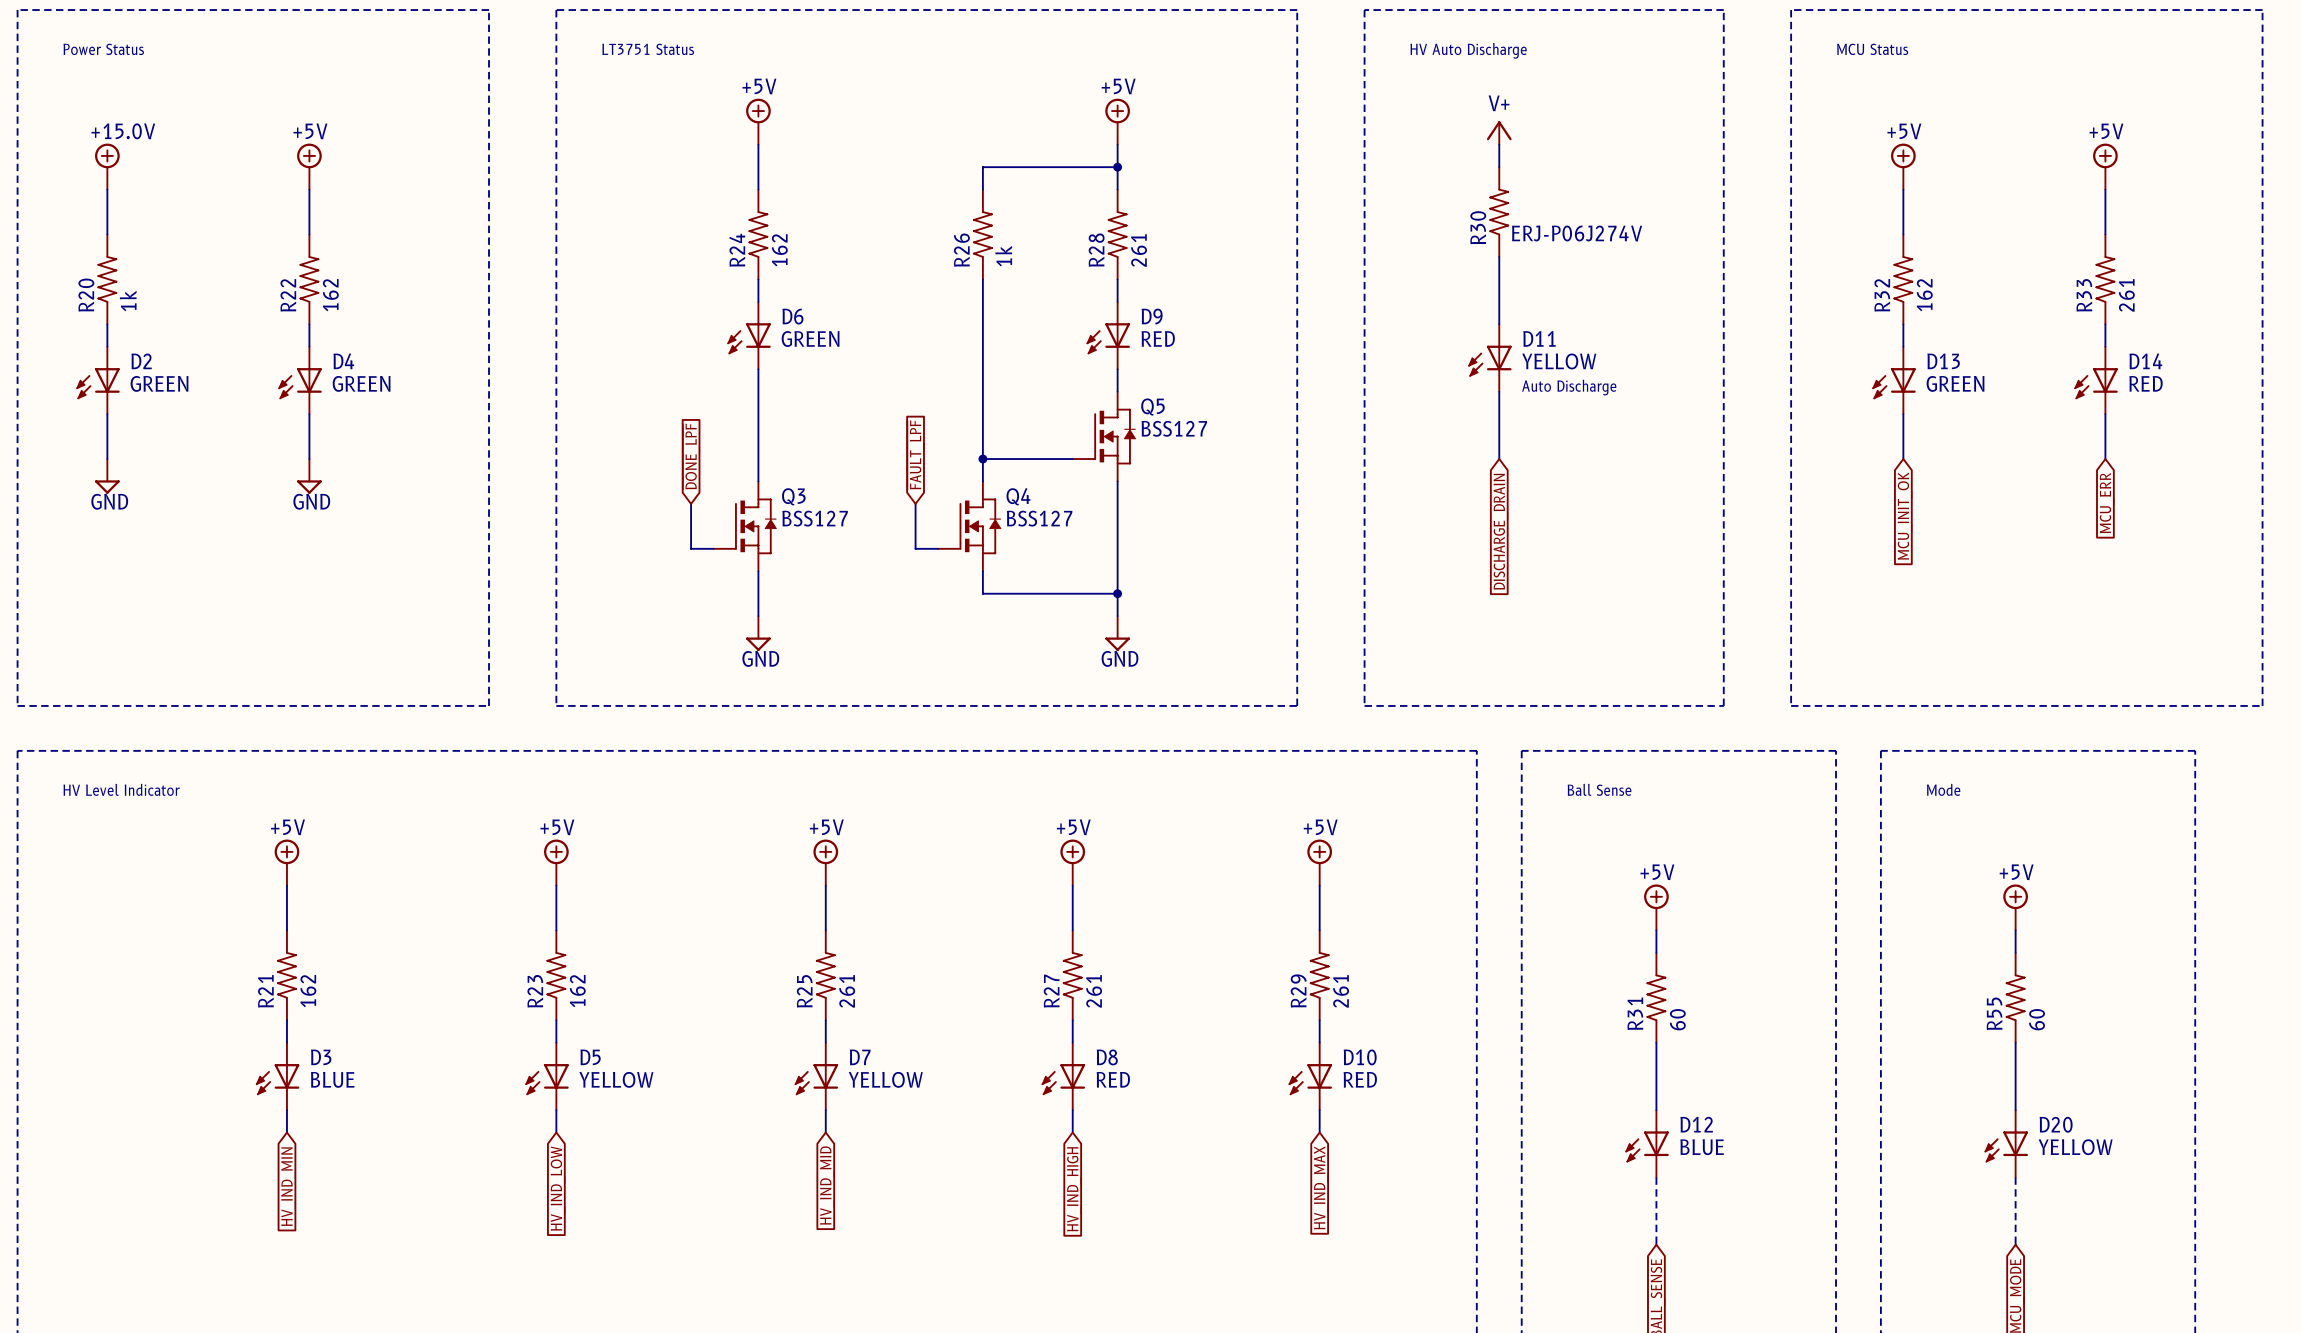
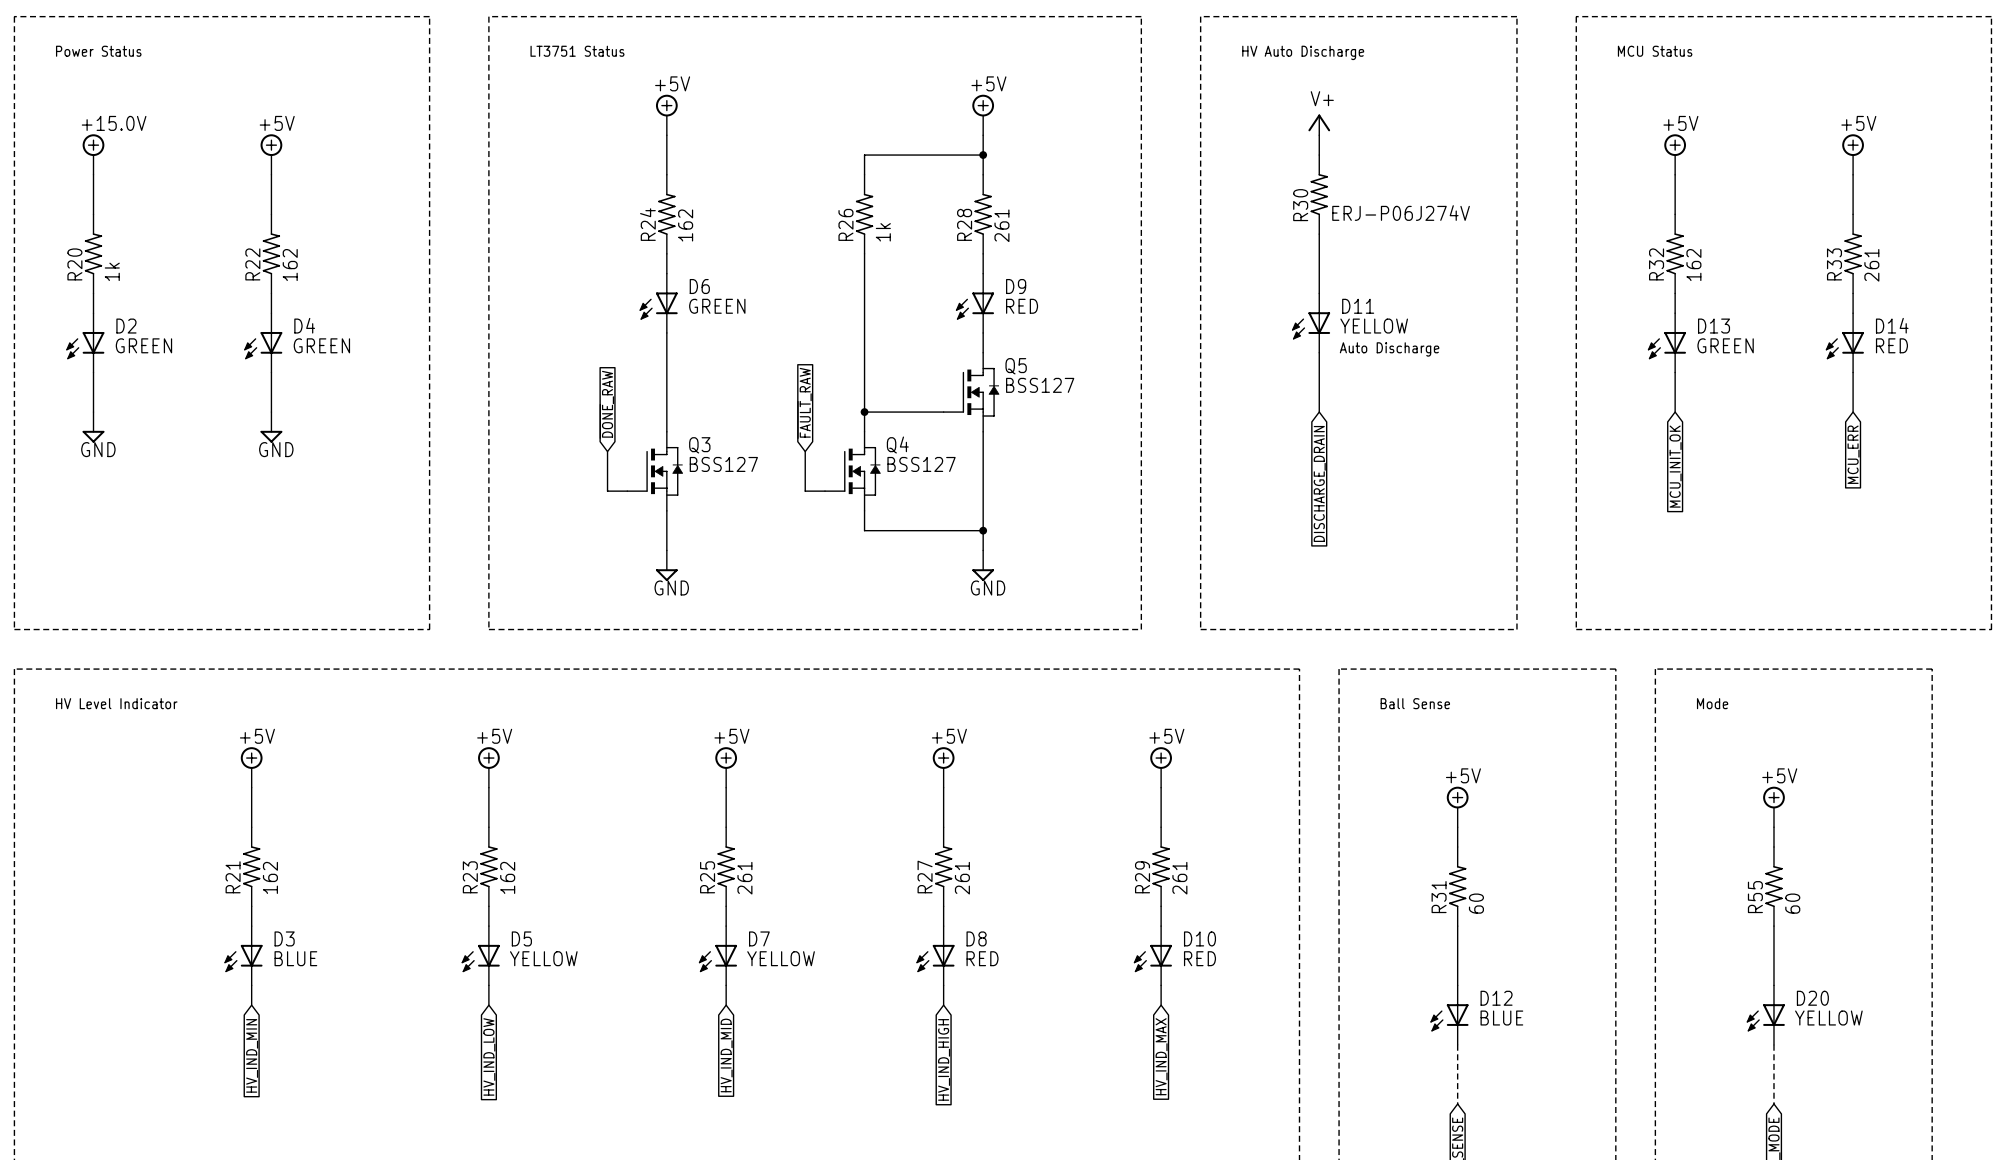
global label: ~{FAULT_LPF} (915, 454) -> ~{FAULT}_RAW (804, 403)
global label: ~{DONE_LPF} (691, 456) -> ~{DONE}_RAW (606, 404)

